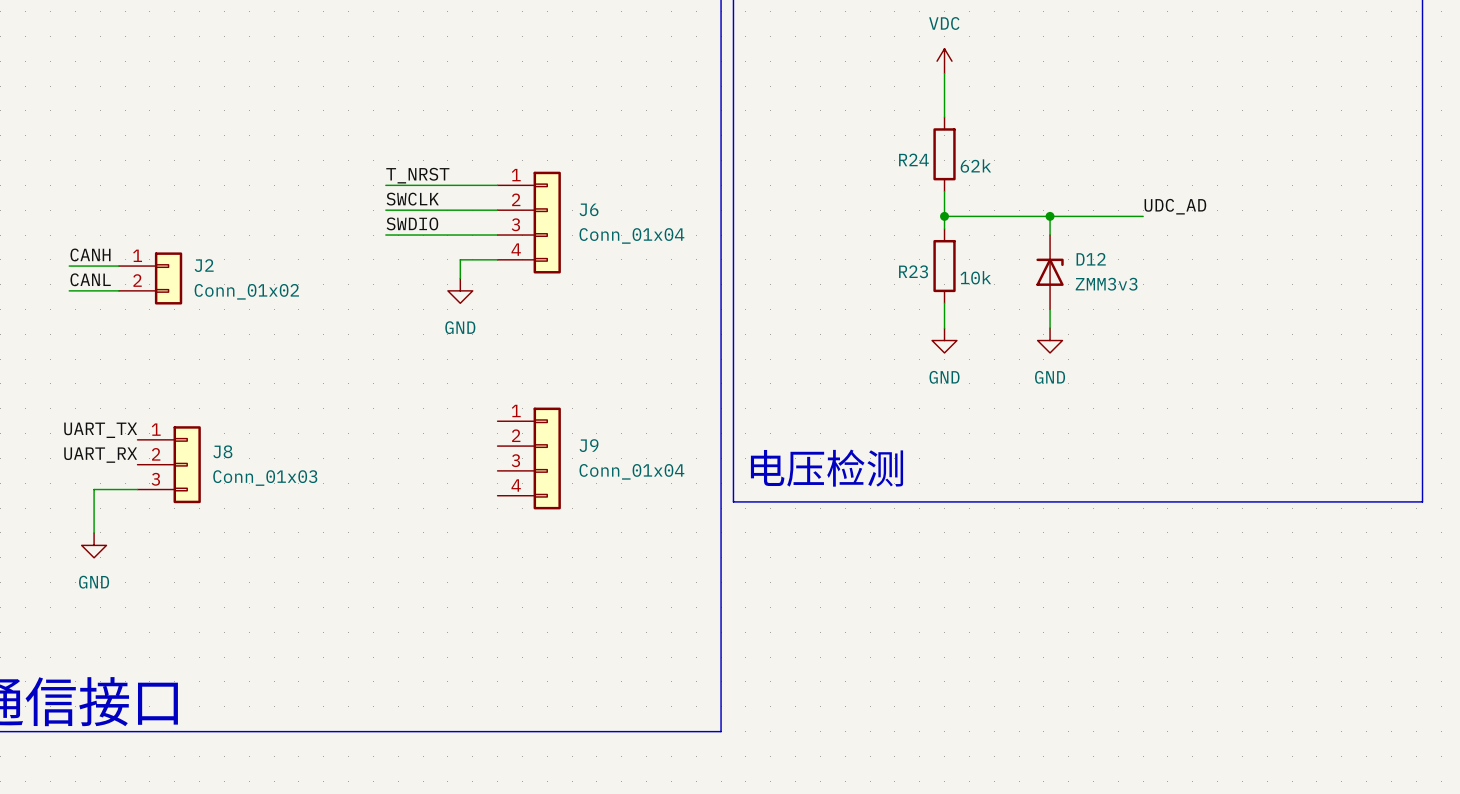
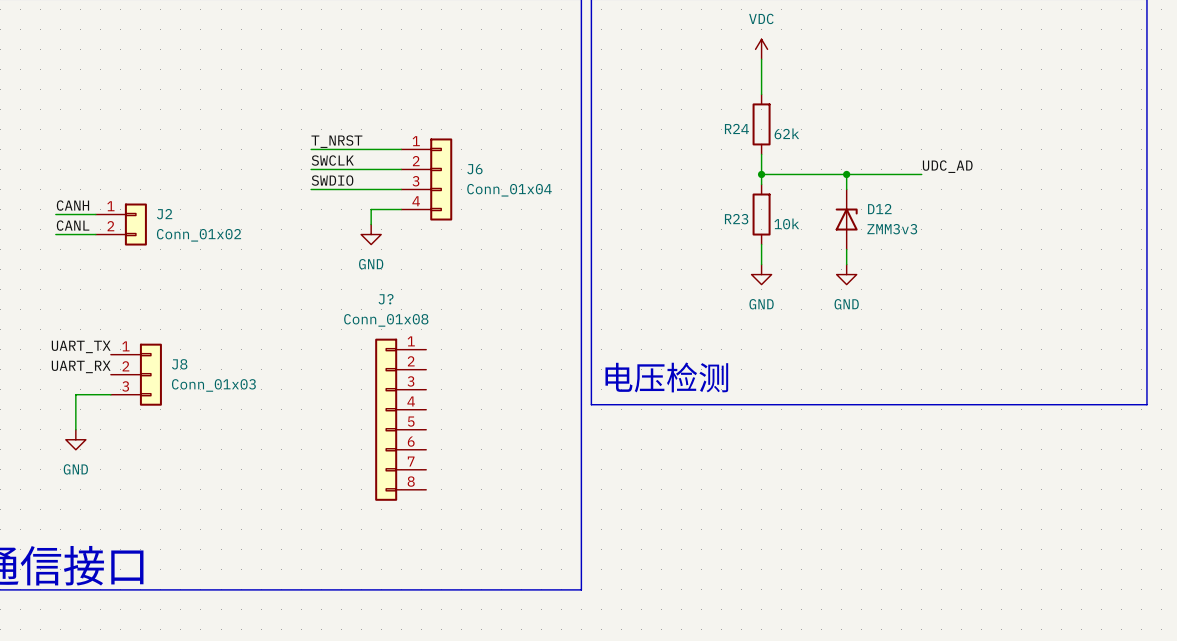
J9: Conn_01x04 (529, 458) -> none
J?: none -> Conn_01x08 (400, 419)

